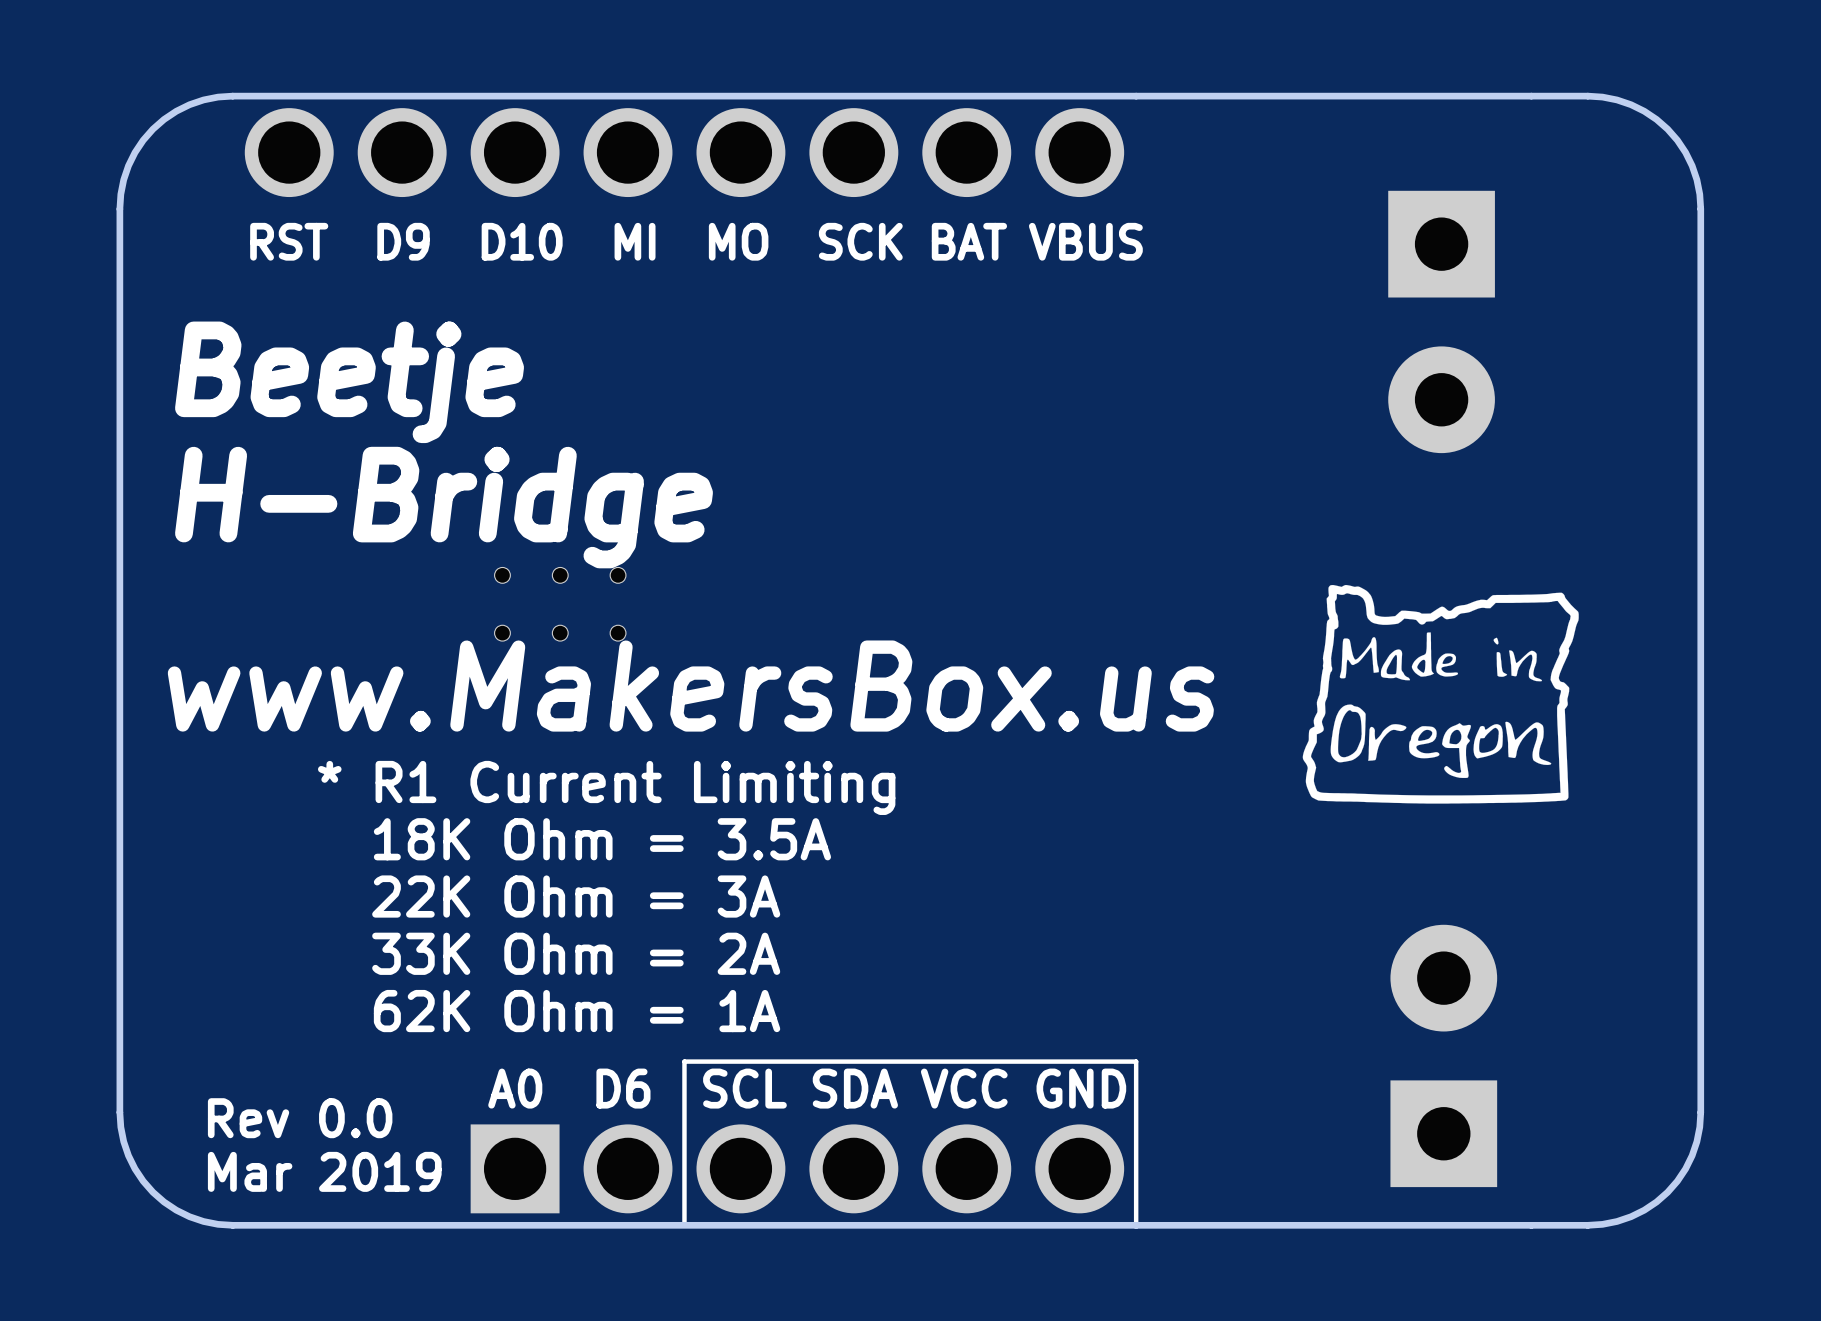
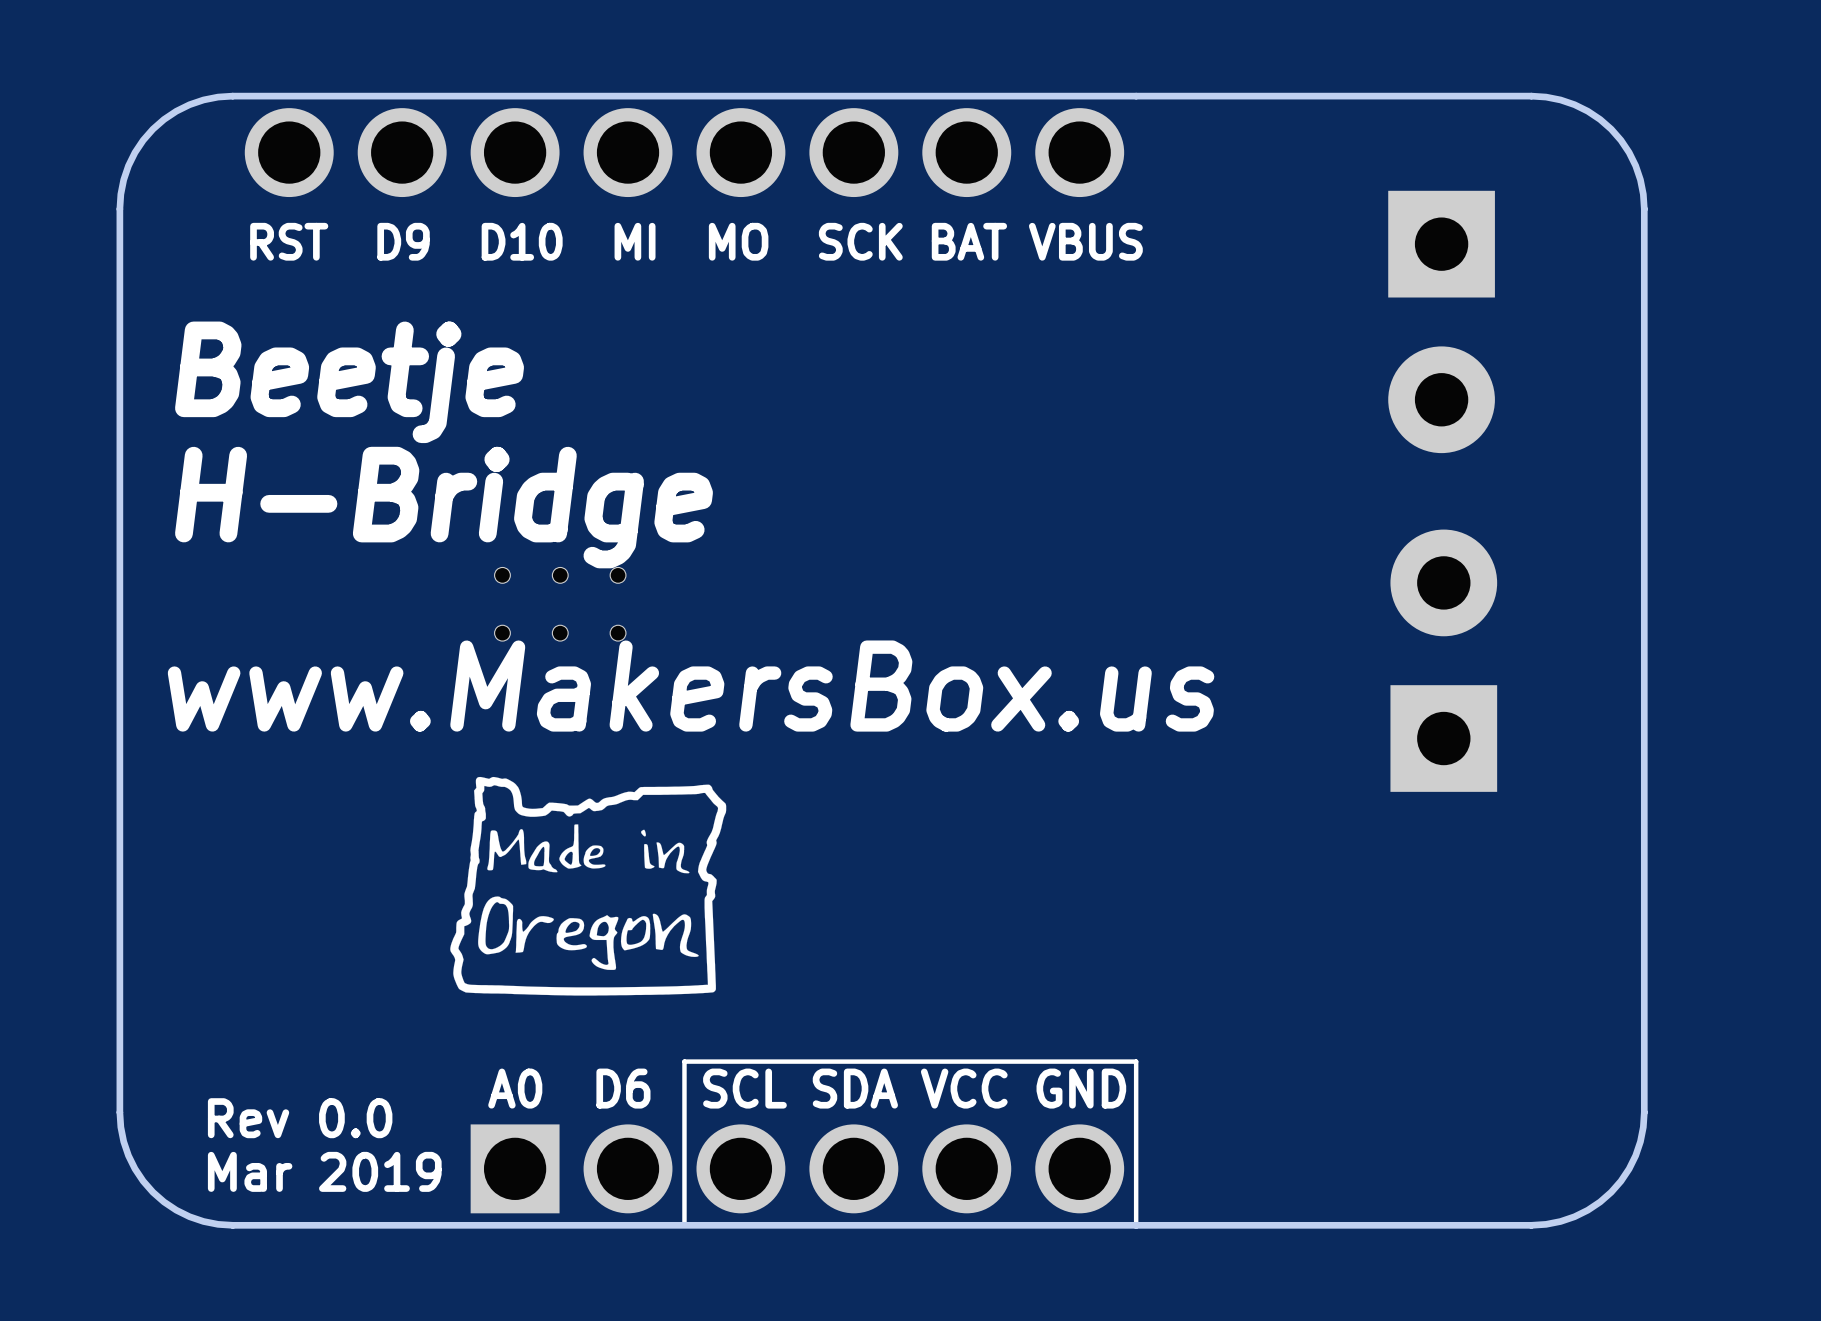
board edge: (1531, 96) (1602, 97) (1617, 99) (1644, 111) (1667, 129) (1685, 152) (1696, 179) (1700, 209) (1699, 1127) (1692, 1155) (1677, 1181) (1667, 1192) (1644, 1210) (1617, 1221) (1602, 1224) (1531, 1225) -> (1531, 96) (1560, 99) (1574, 104) (1587, 111) (1611, 129) (1620, 140) (1635, 165) (1640, 179) (1644, 209) (1643, 1127) (1640, 1141) (1629, 1168) (1611, 1192) (1600, 1201) (1574, 1216) (1560, 1221) (1531, 1225)
drawing position: (1440, 694) -> (588, 886)
text: * R1 Current Limiting (606, 787) -> none
text: 18K Ohm = 3.5A (602, 839) -> none
text: 22K Ohm = 3A (576, 896) -> none
text: 33K Ohm = 2A (576, 953) -> none
text: 62K Ohm = 1A (577, 1011) -> none
part position: (1443, 1055) -> (1443, 660)

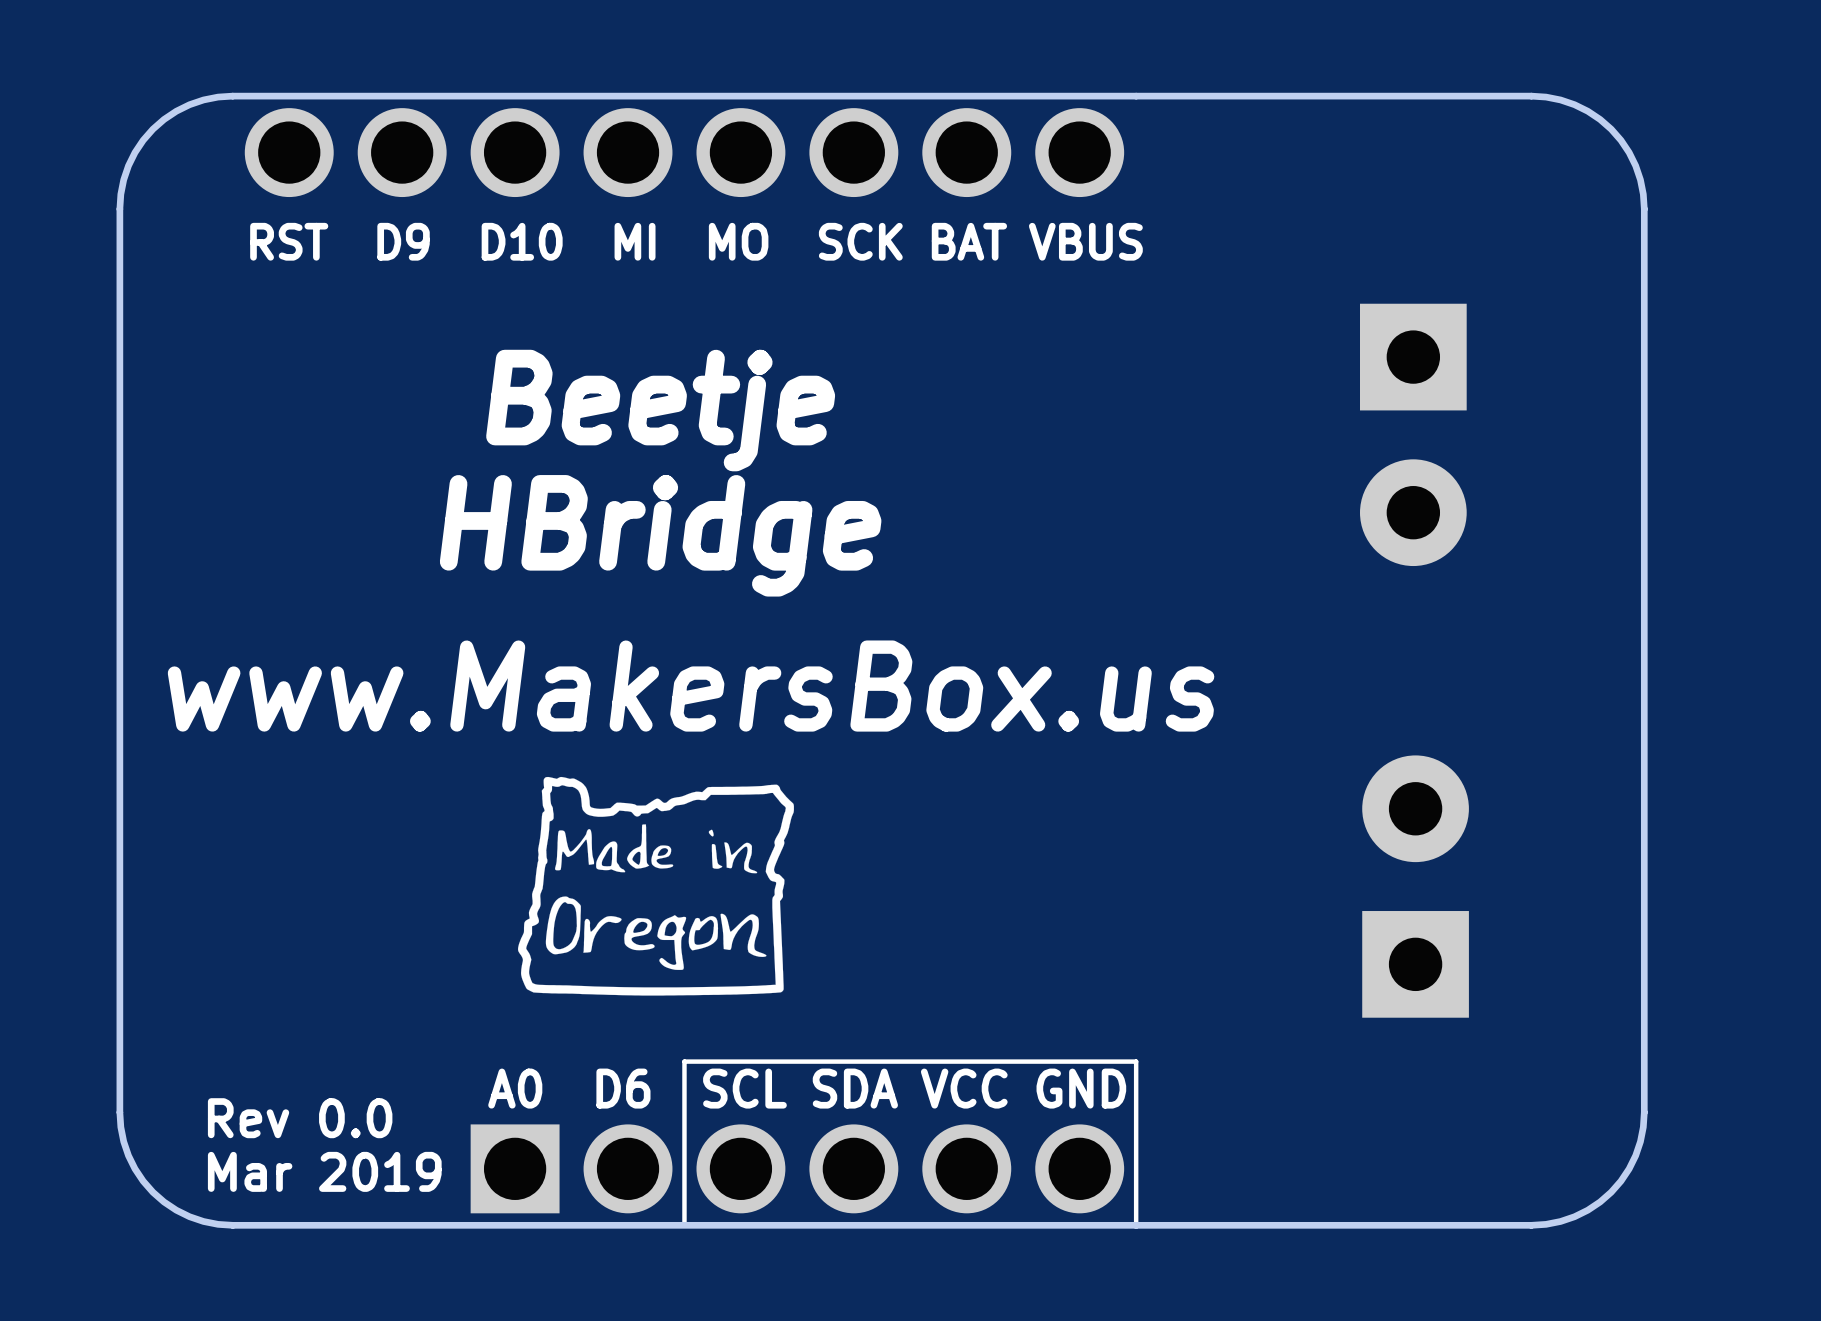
part: (1441, 321) -> none
text position: Beetje (349, 382) -> Beetje (660, 410)
part: none -> (1413, 434)
text: H-Bridge (444, 507) -> HBridge (660, 535)
part: (560, 604) -> none
part: (1443, 660) -> none
drawing position: (588, 886) -> (655, 886)
part: none -> (1415, 886)

